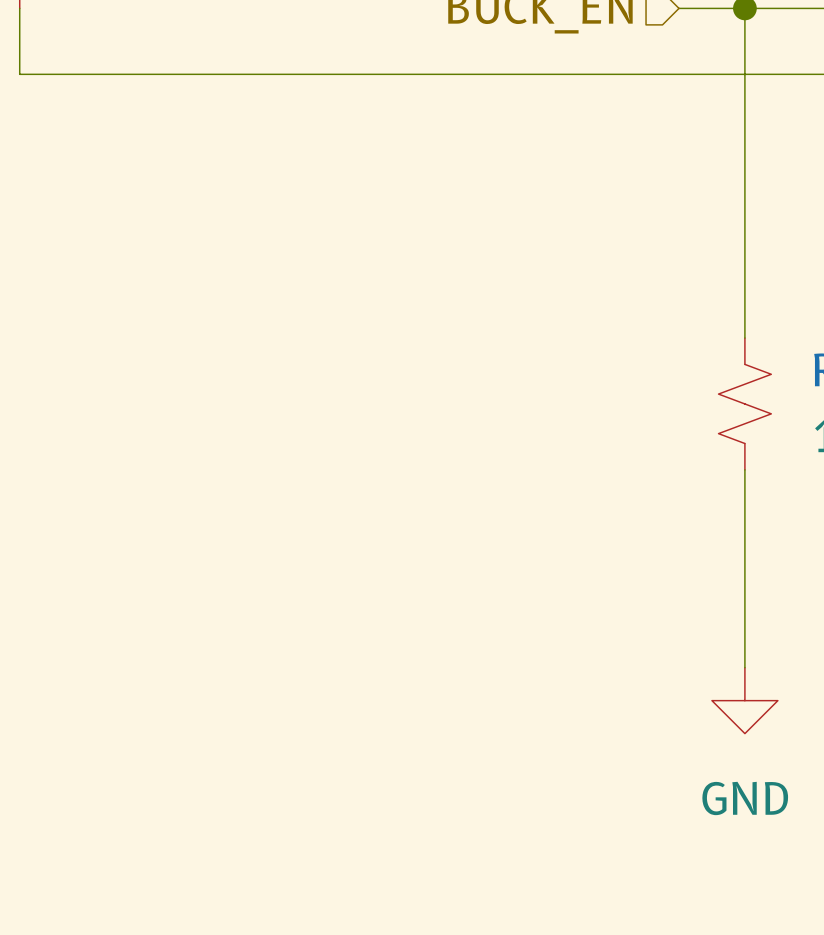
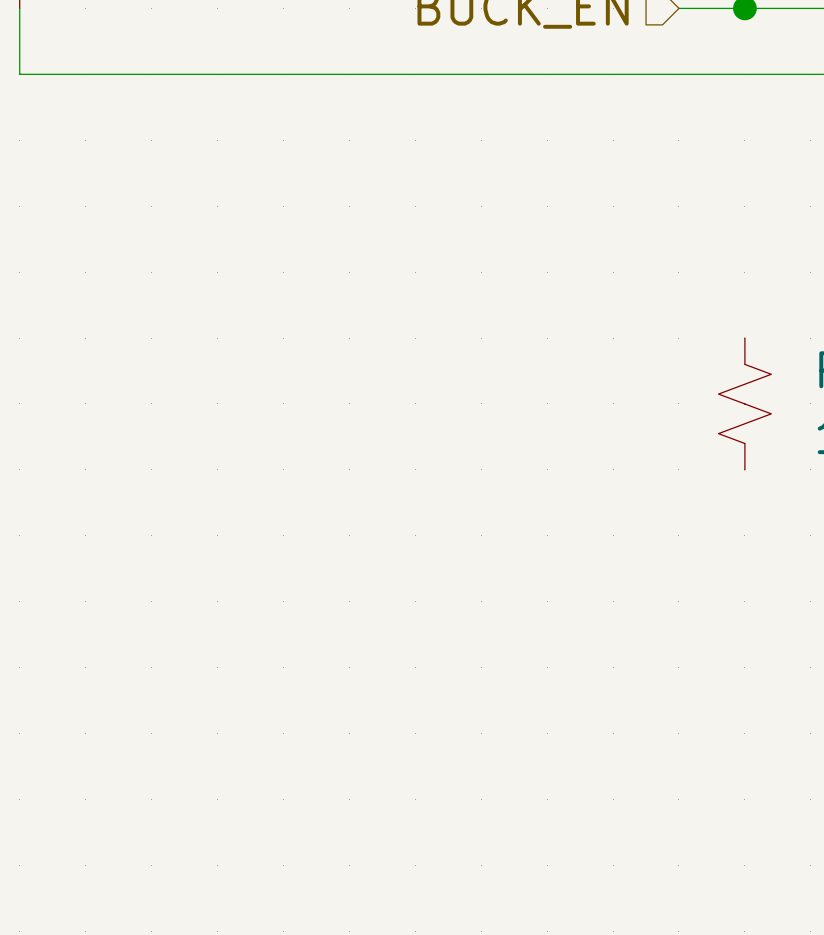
wire: (744, 8) (744, 338) -> none
wire: (744, 469) (744, 667) -> none
power symbol: GND (744, 700) -> none

